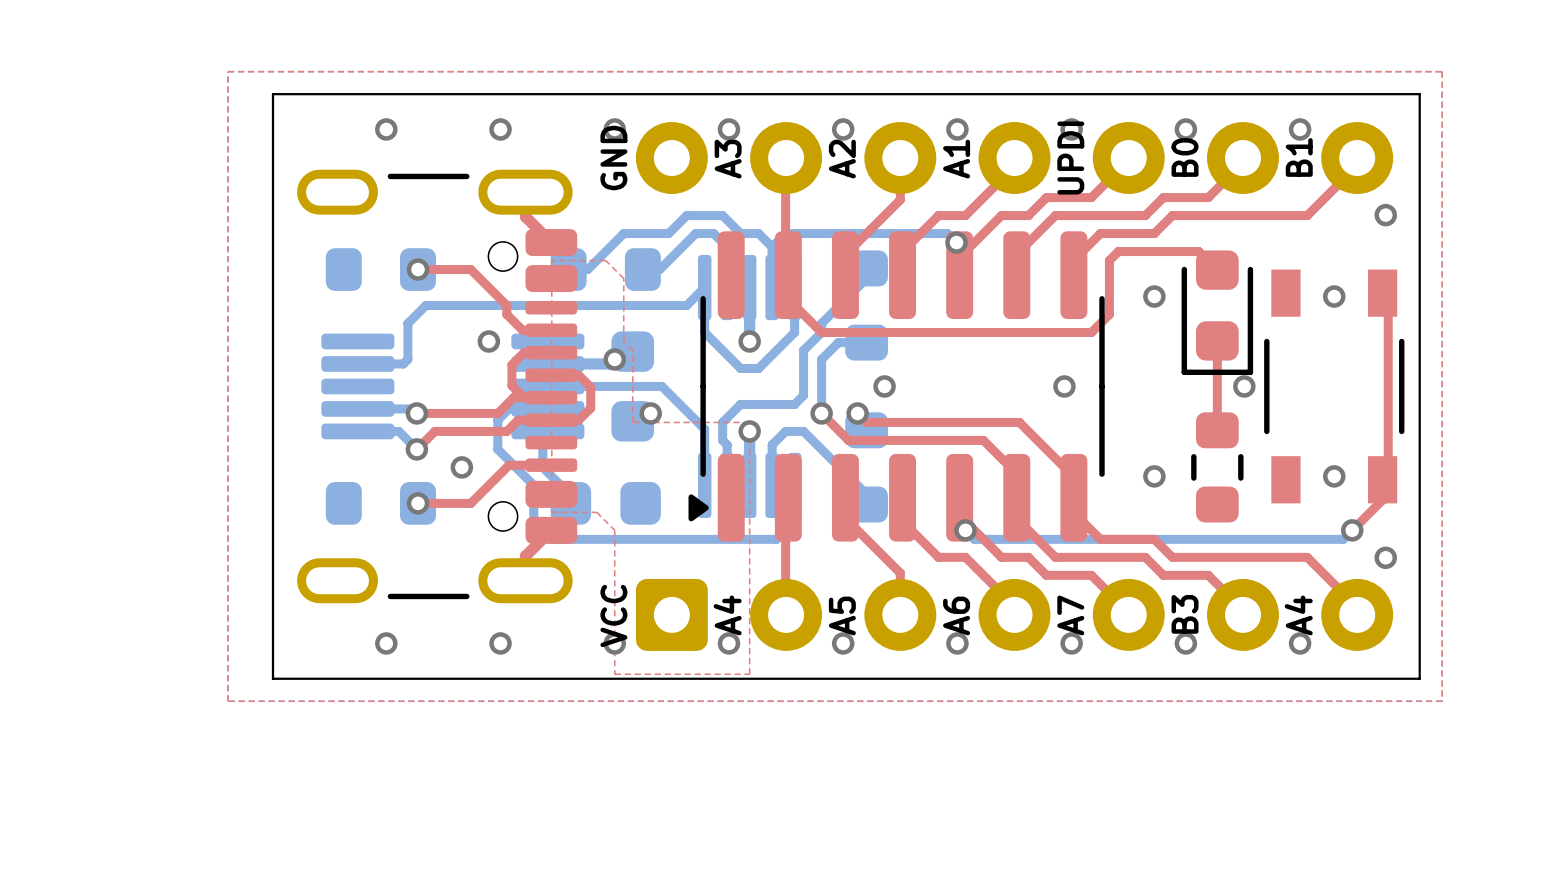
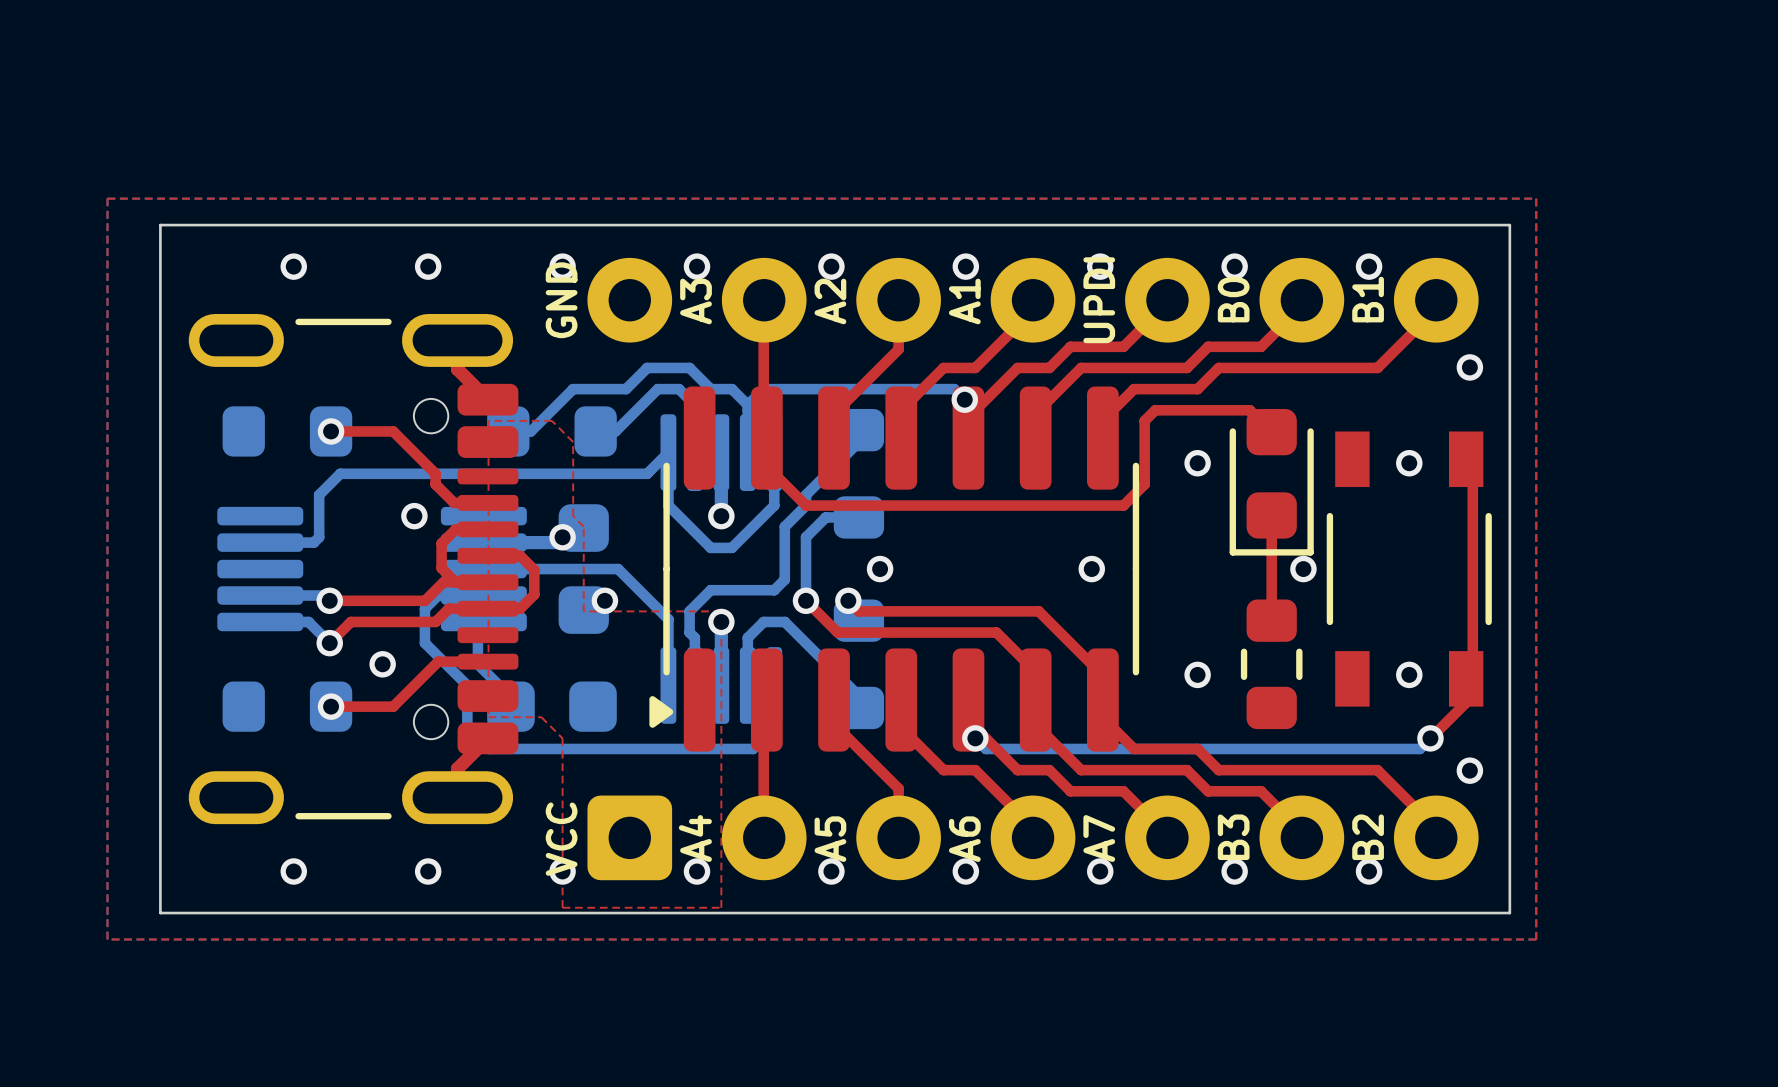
text: A4 (1298, 615) -> B2 (1368, 837)

